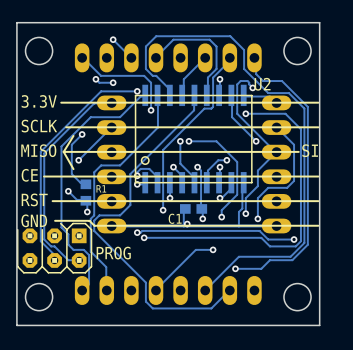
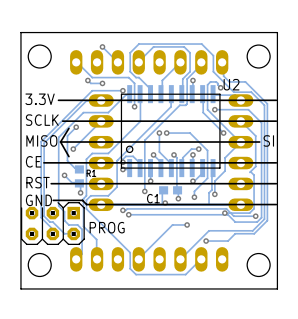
track: none -> (250, 171) (254, 175) (254, 208) (249, 213) (224, 213)
track: (287, 187) (268, 187) (257, 198) (257, 218) -> none
via position: (257, 218) -> (224, 213)

